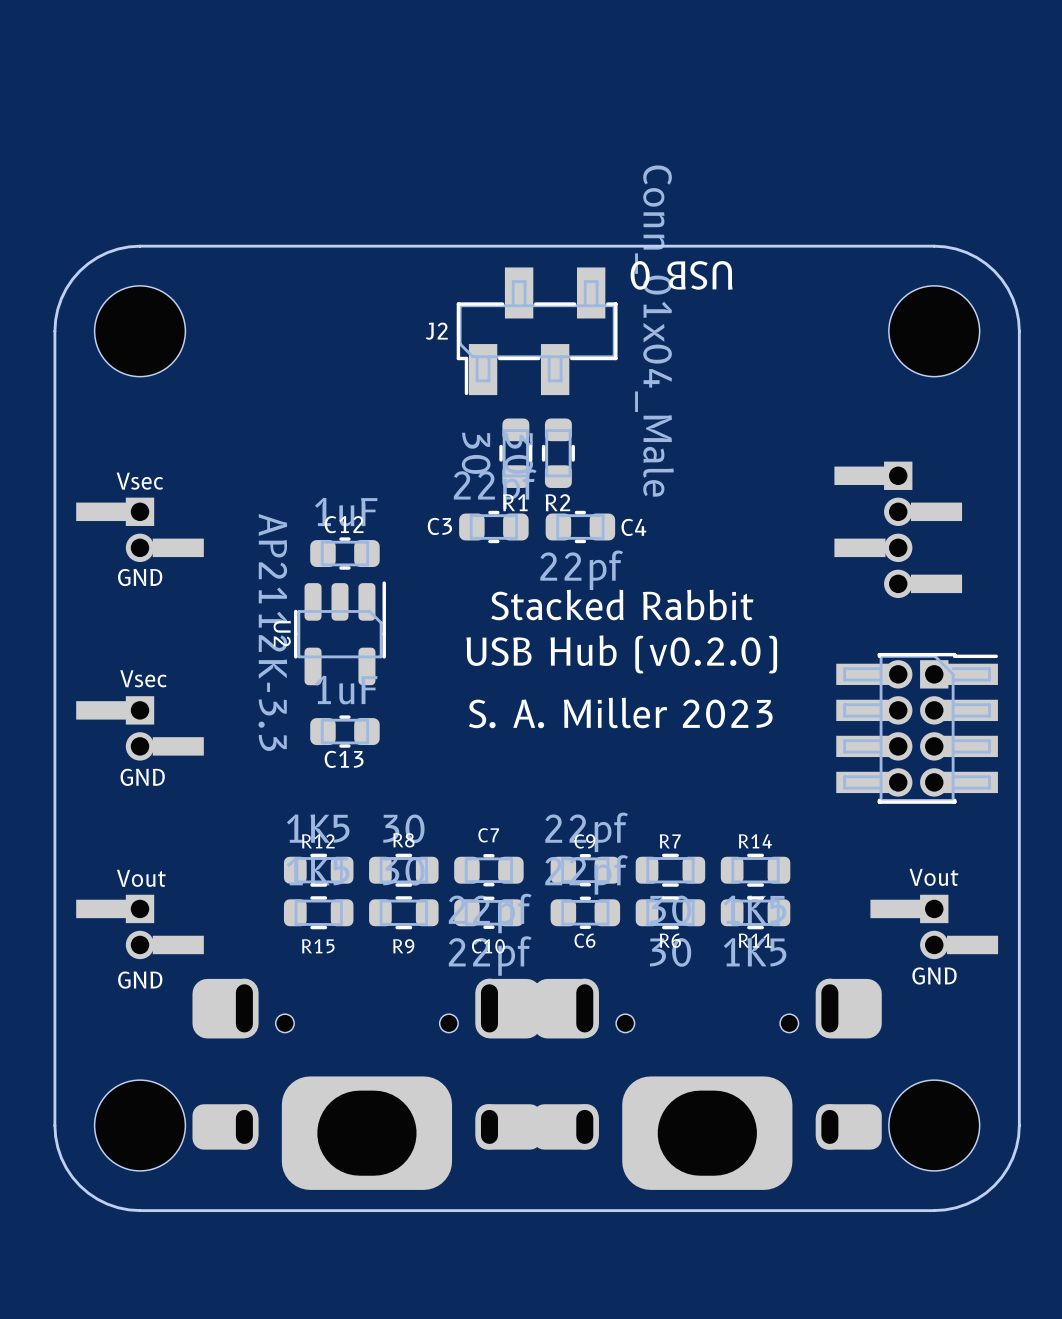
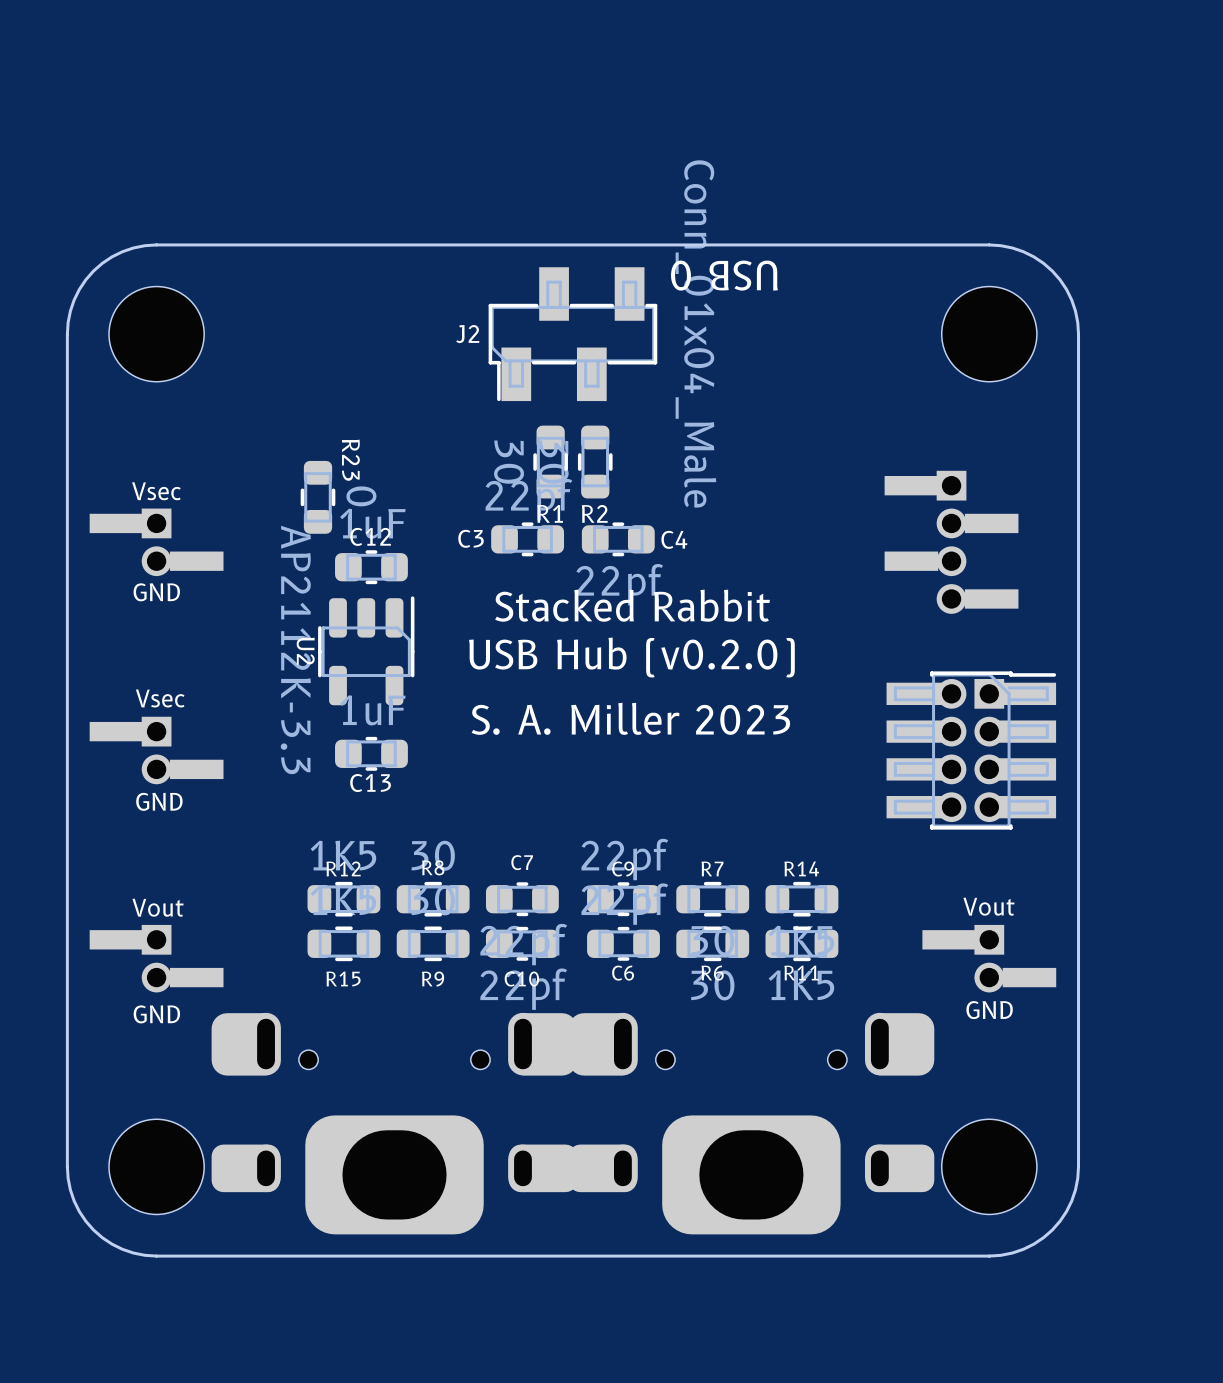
R23: none -> 0 (318, 497)
text position: Stacked Rabbit (622, 605) -> Stacked Rabbit (632, 605)
text position: USB Hub (v0.2.0) (621, 654) -> USB Hub (v0.2.0) (631, 657)
text position: S. A. Miller 2023 (620, 712) -> S. A. Miller 2023 (630, 718)

